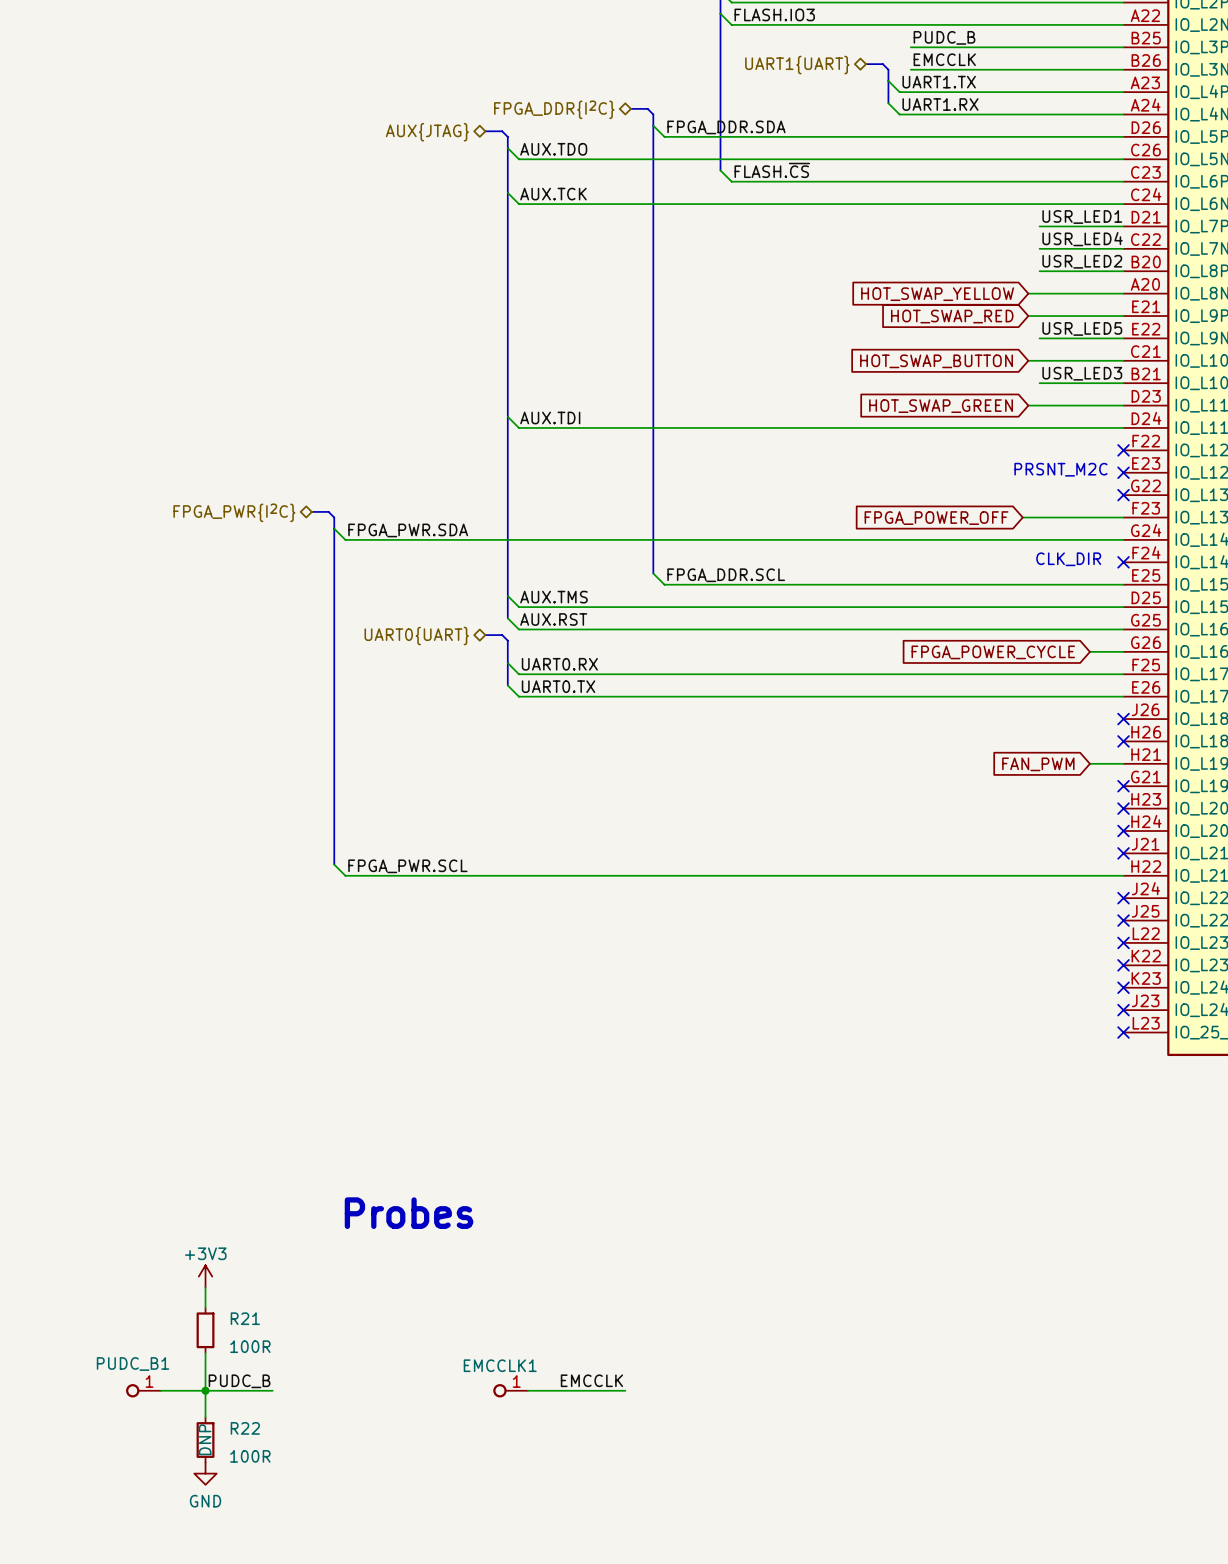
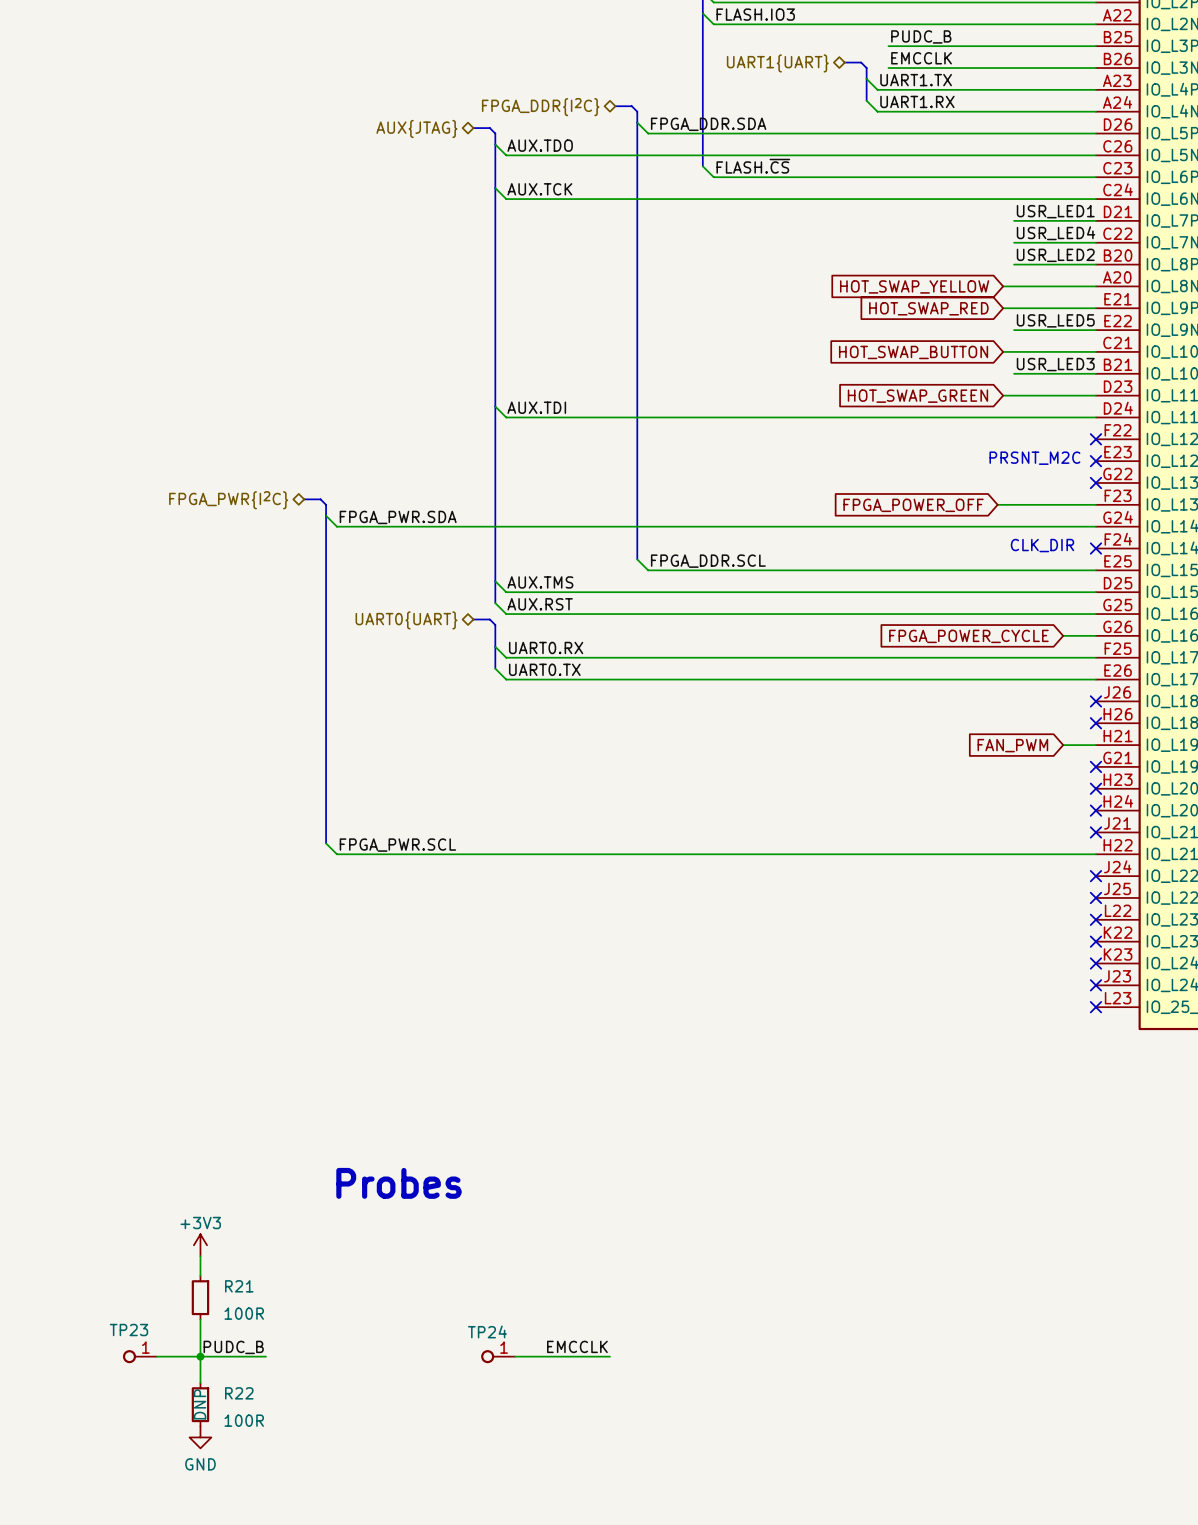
PUDC_B1 name: PUDC_B1 (133, 1364) -> TP23 (128, 1330)
EMCCLK1 name: EMCCLK1 (500, 1365) -> TP24 (487, 1331)

